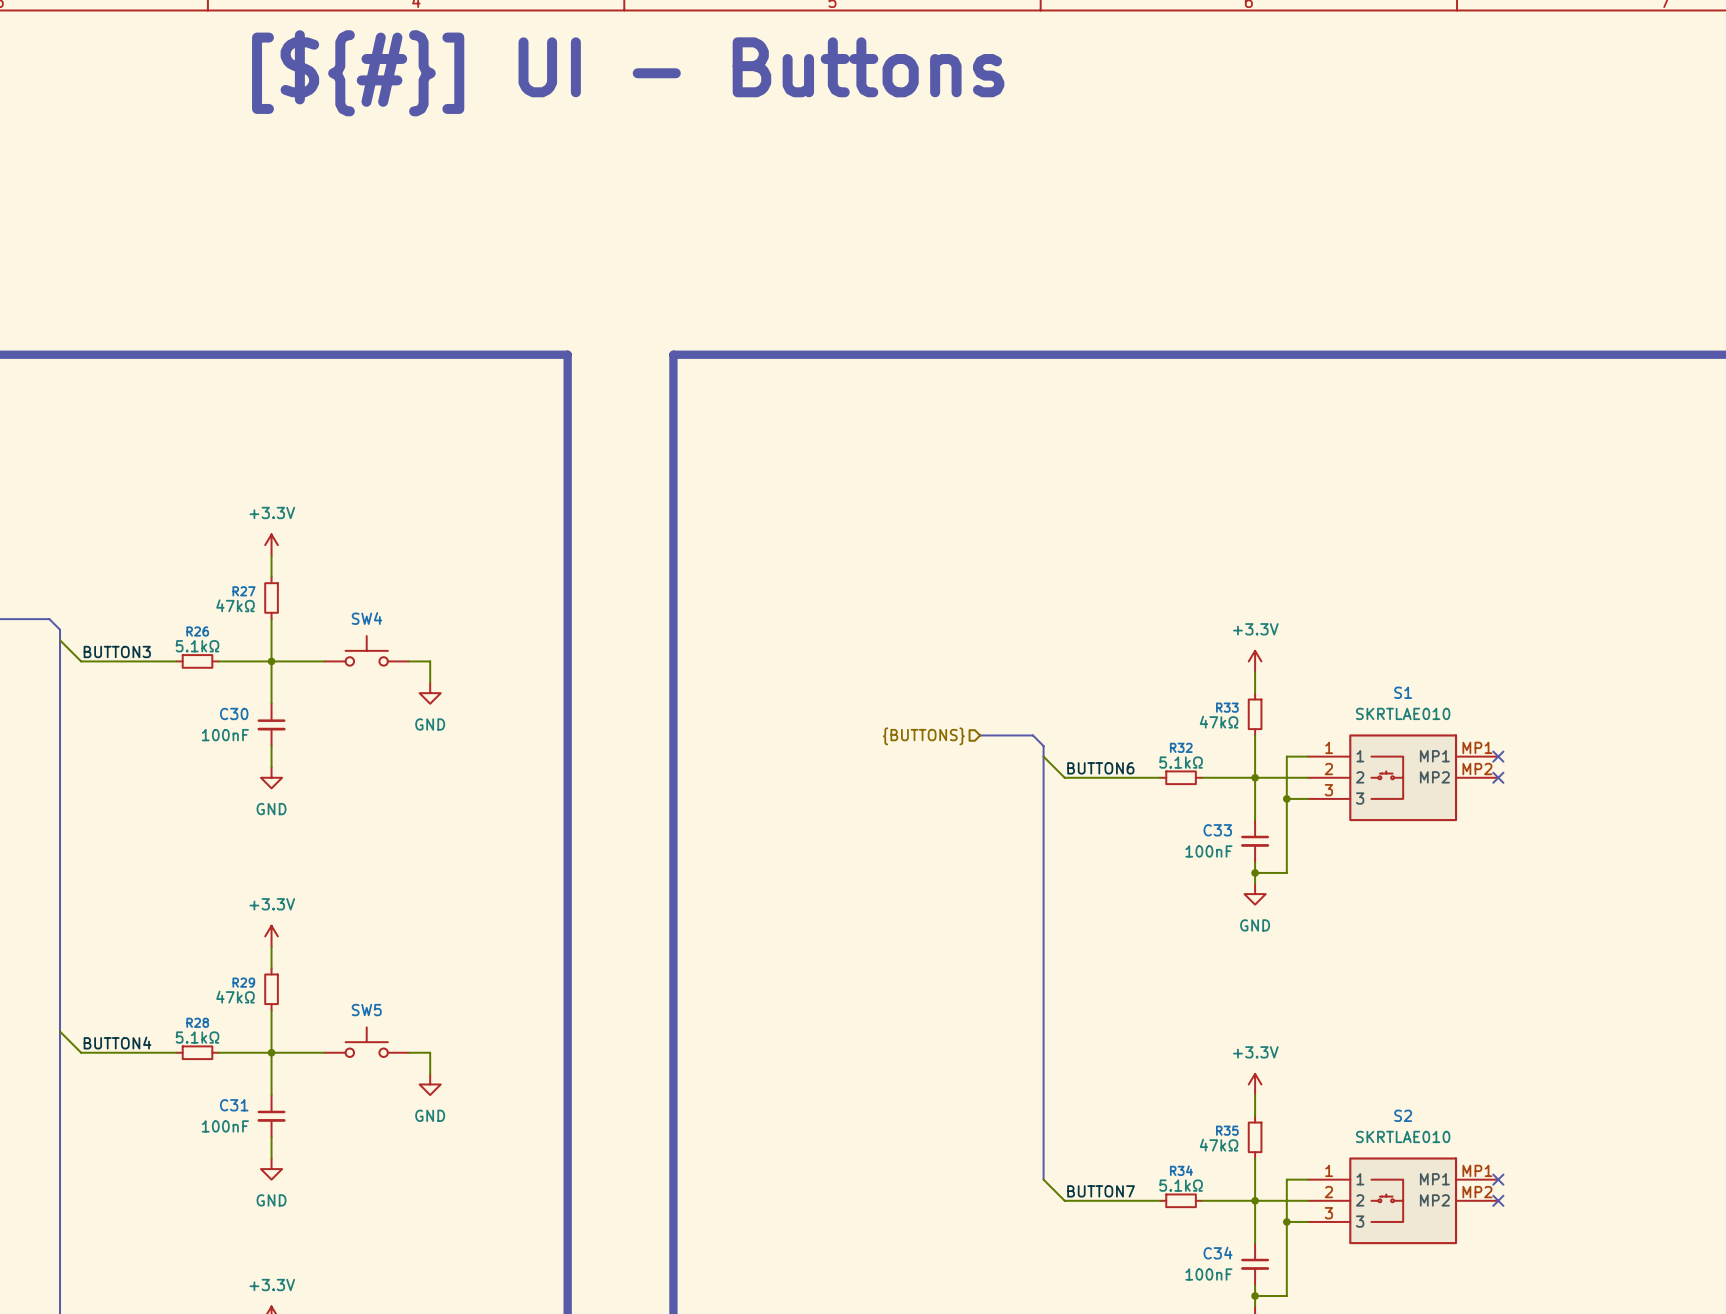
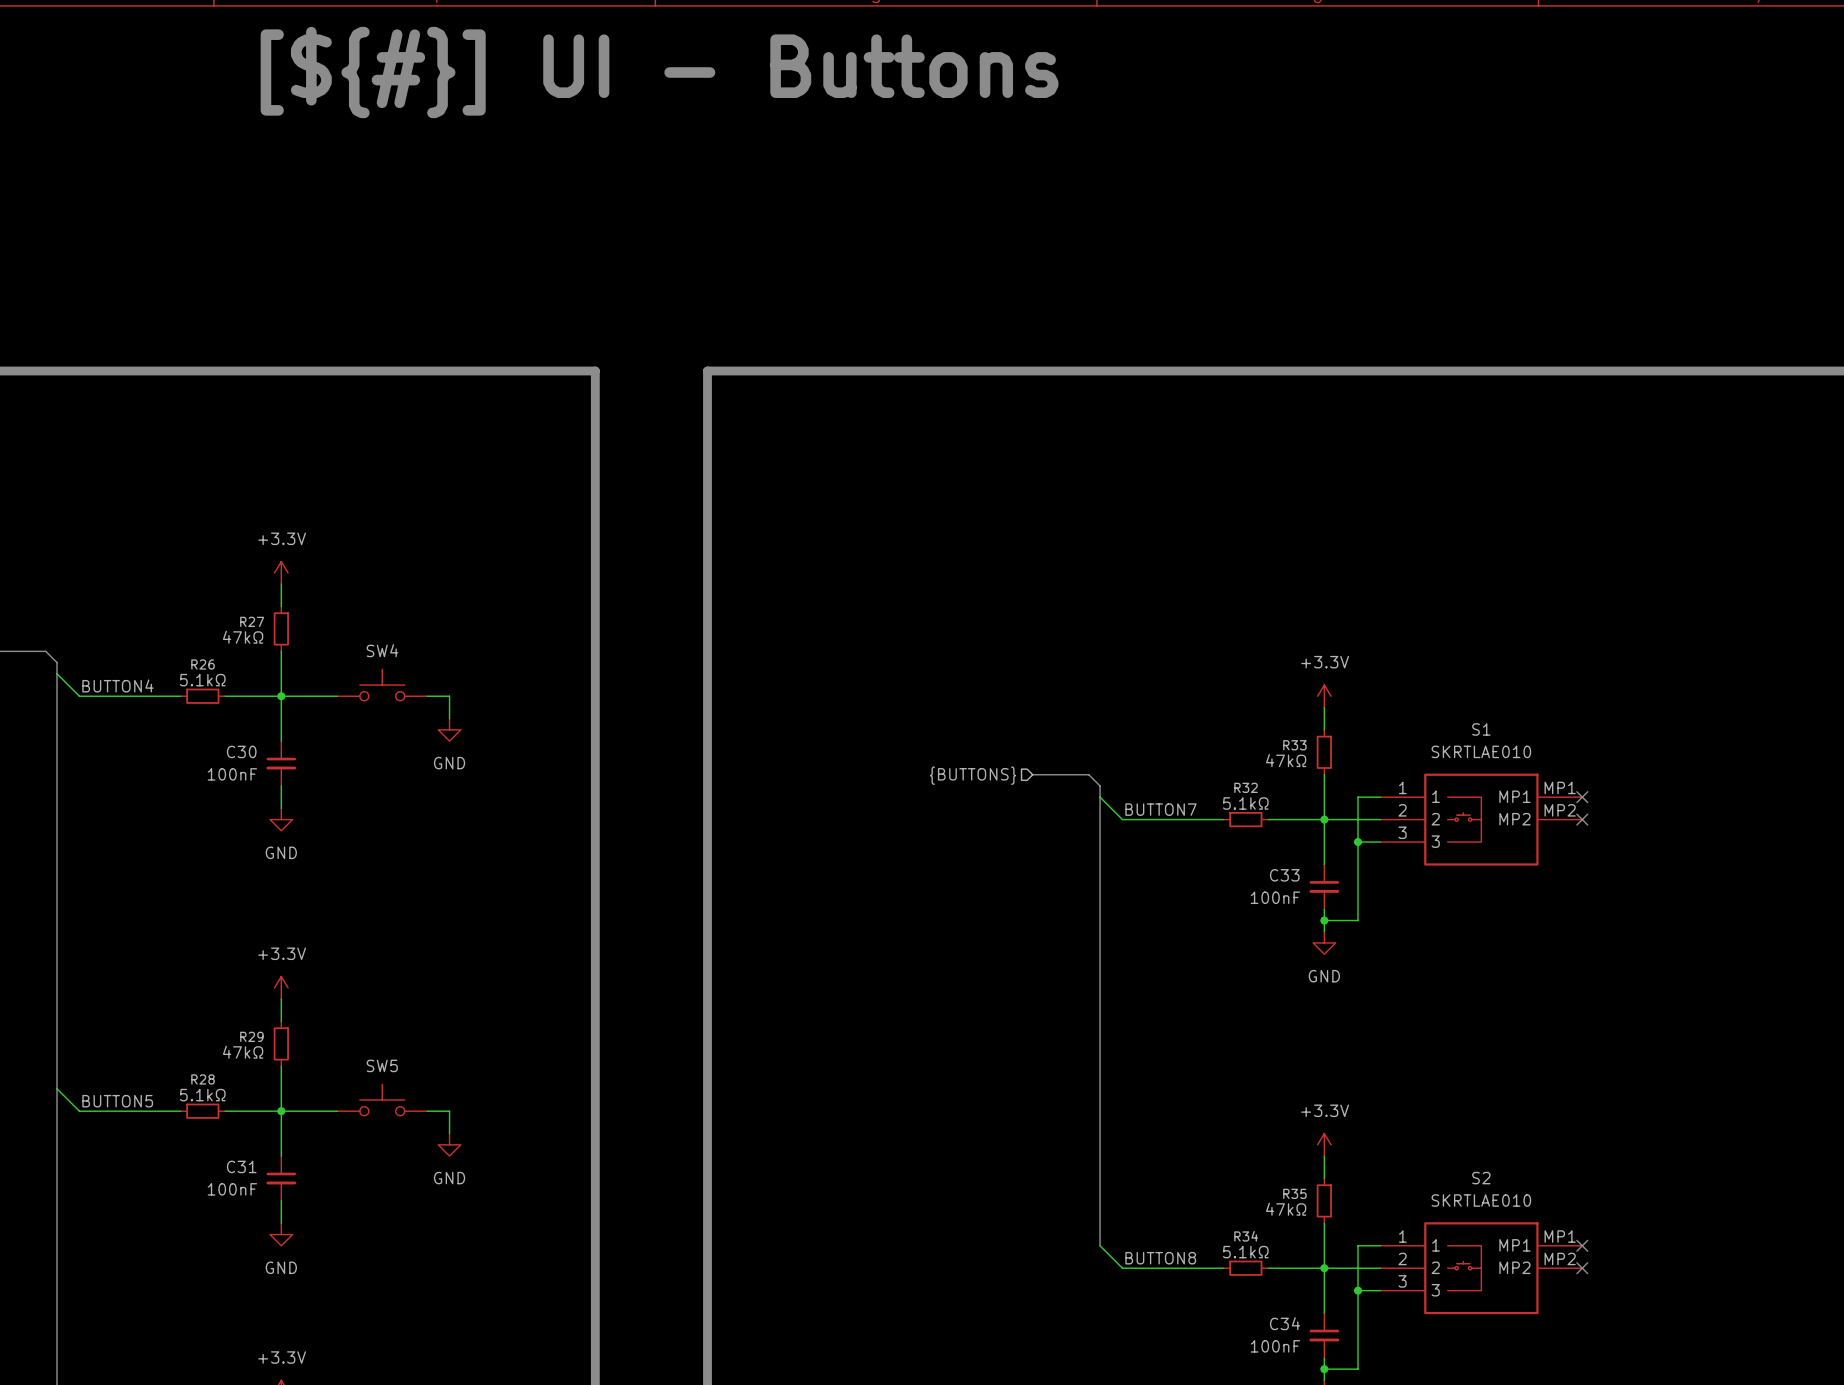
label: BUTTON3 (117, 651) -> BUTTON4 (117, 685)
label: BUTTON6 (1100, 768) -> BUTTON7 (1161, 809)
label: BUTTON4 (117, 1043) -> BUTTON5 (117, 1101)
label: BUTTON7 (1101, 1191) -> BUTTON8 (1160, 1258)

